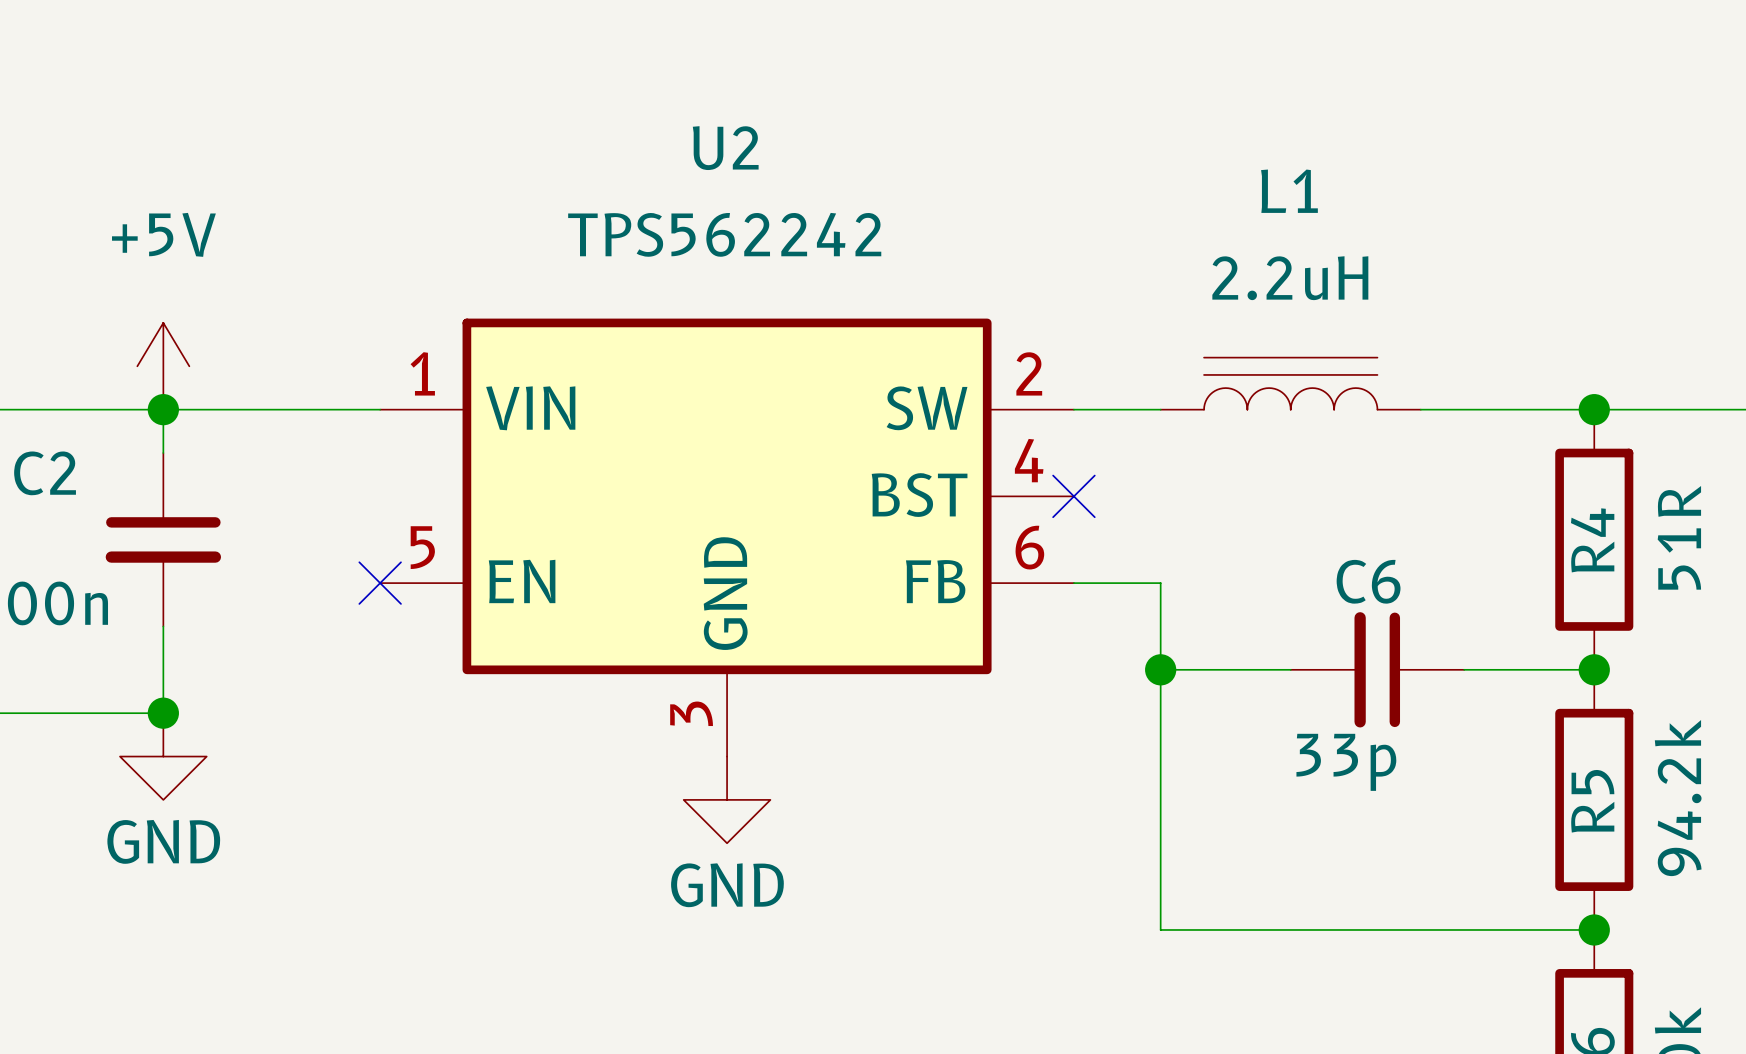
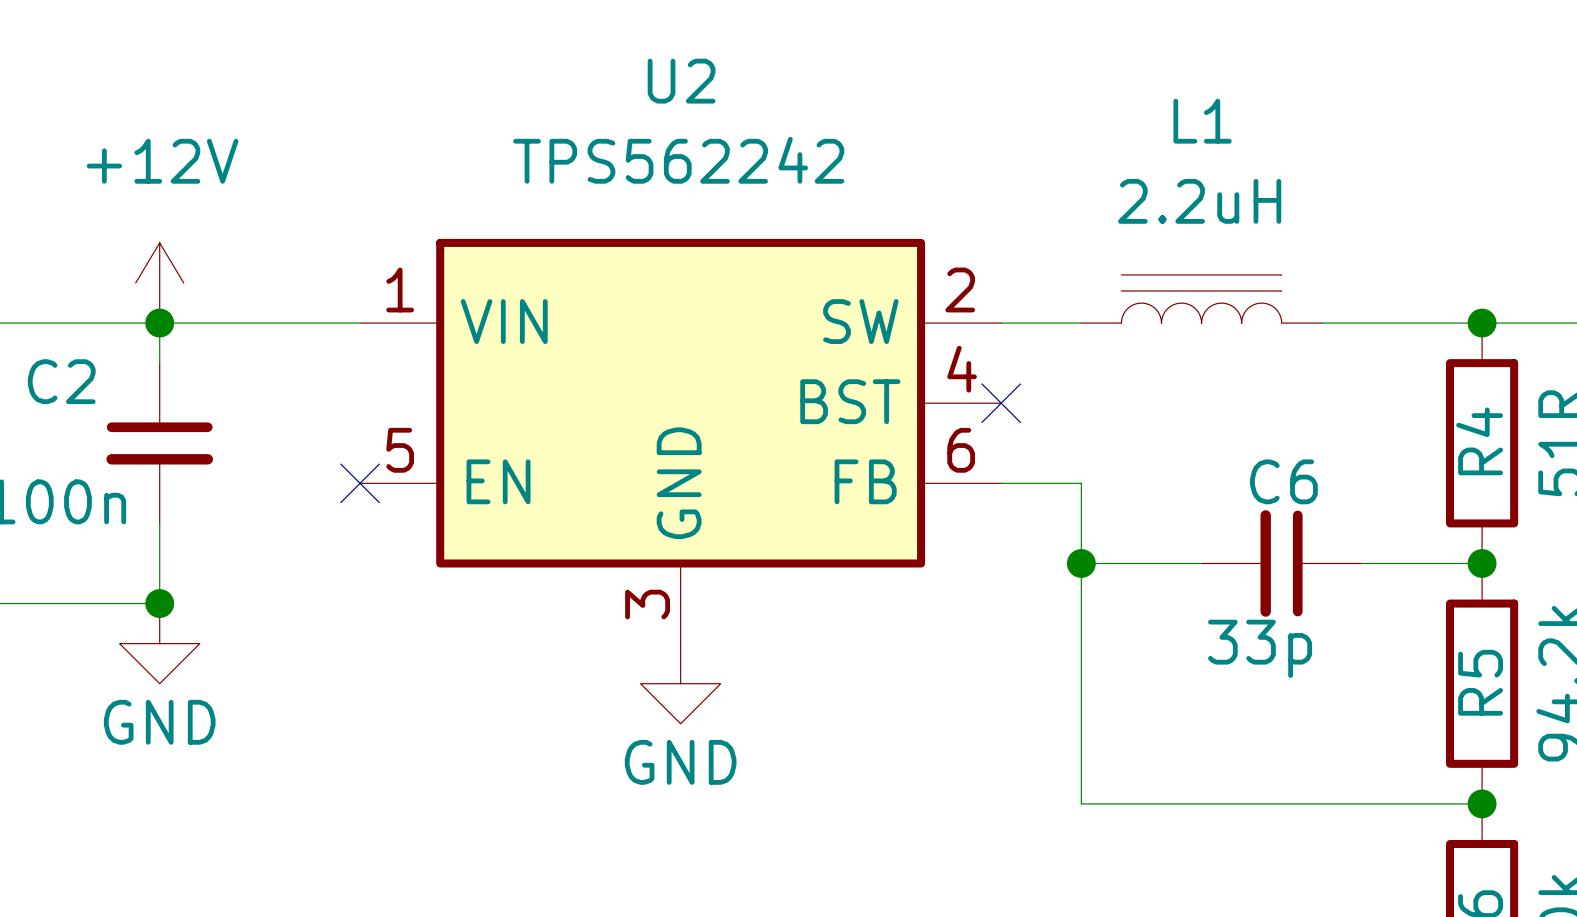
power symbol: +5V (163, 366) -> +12V (159, 282)

